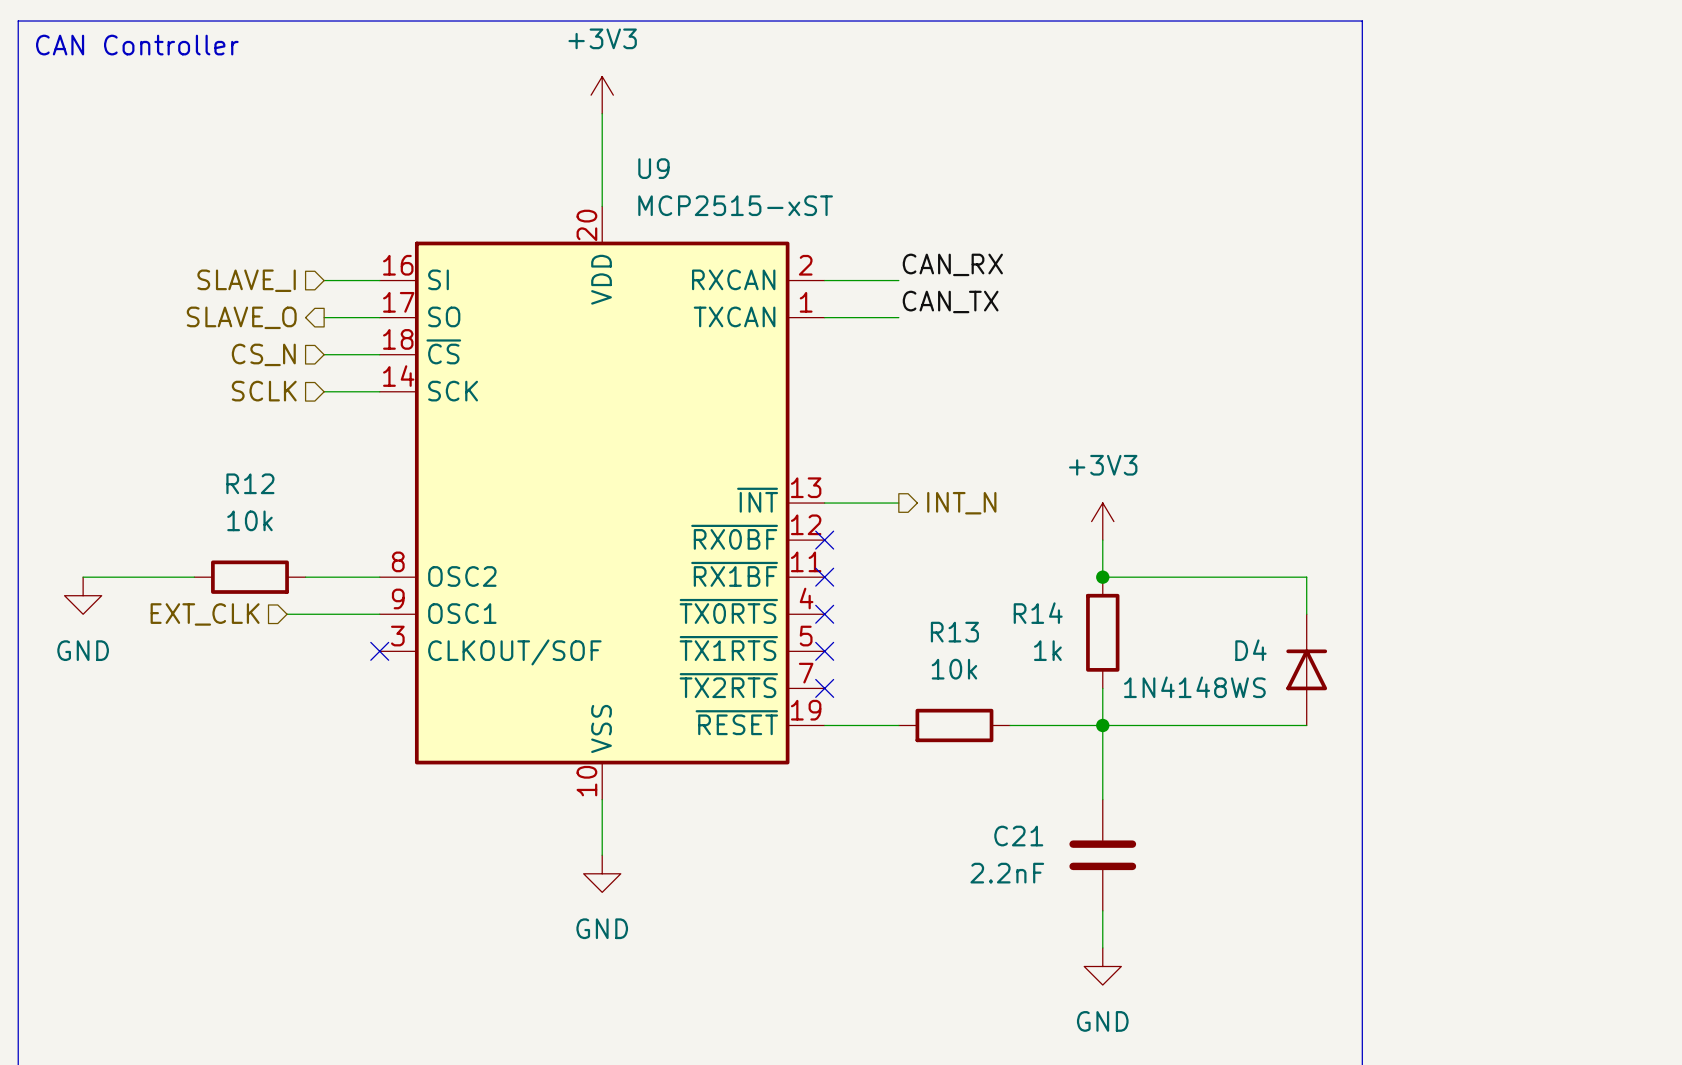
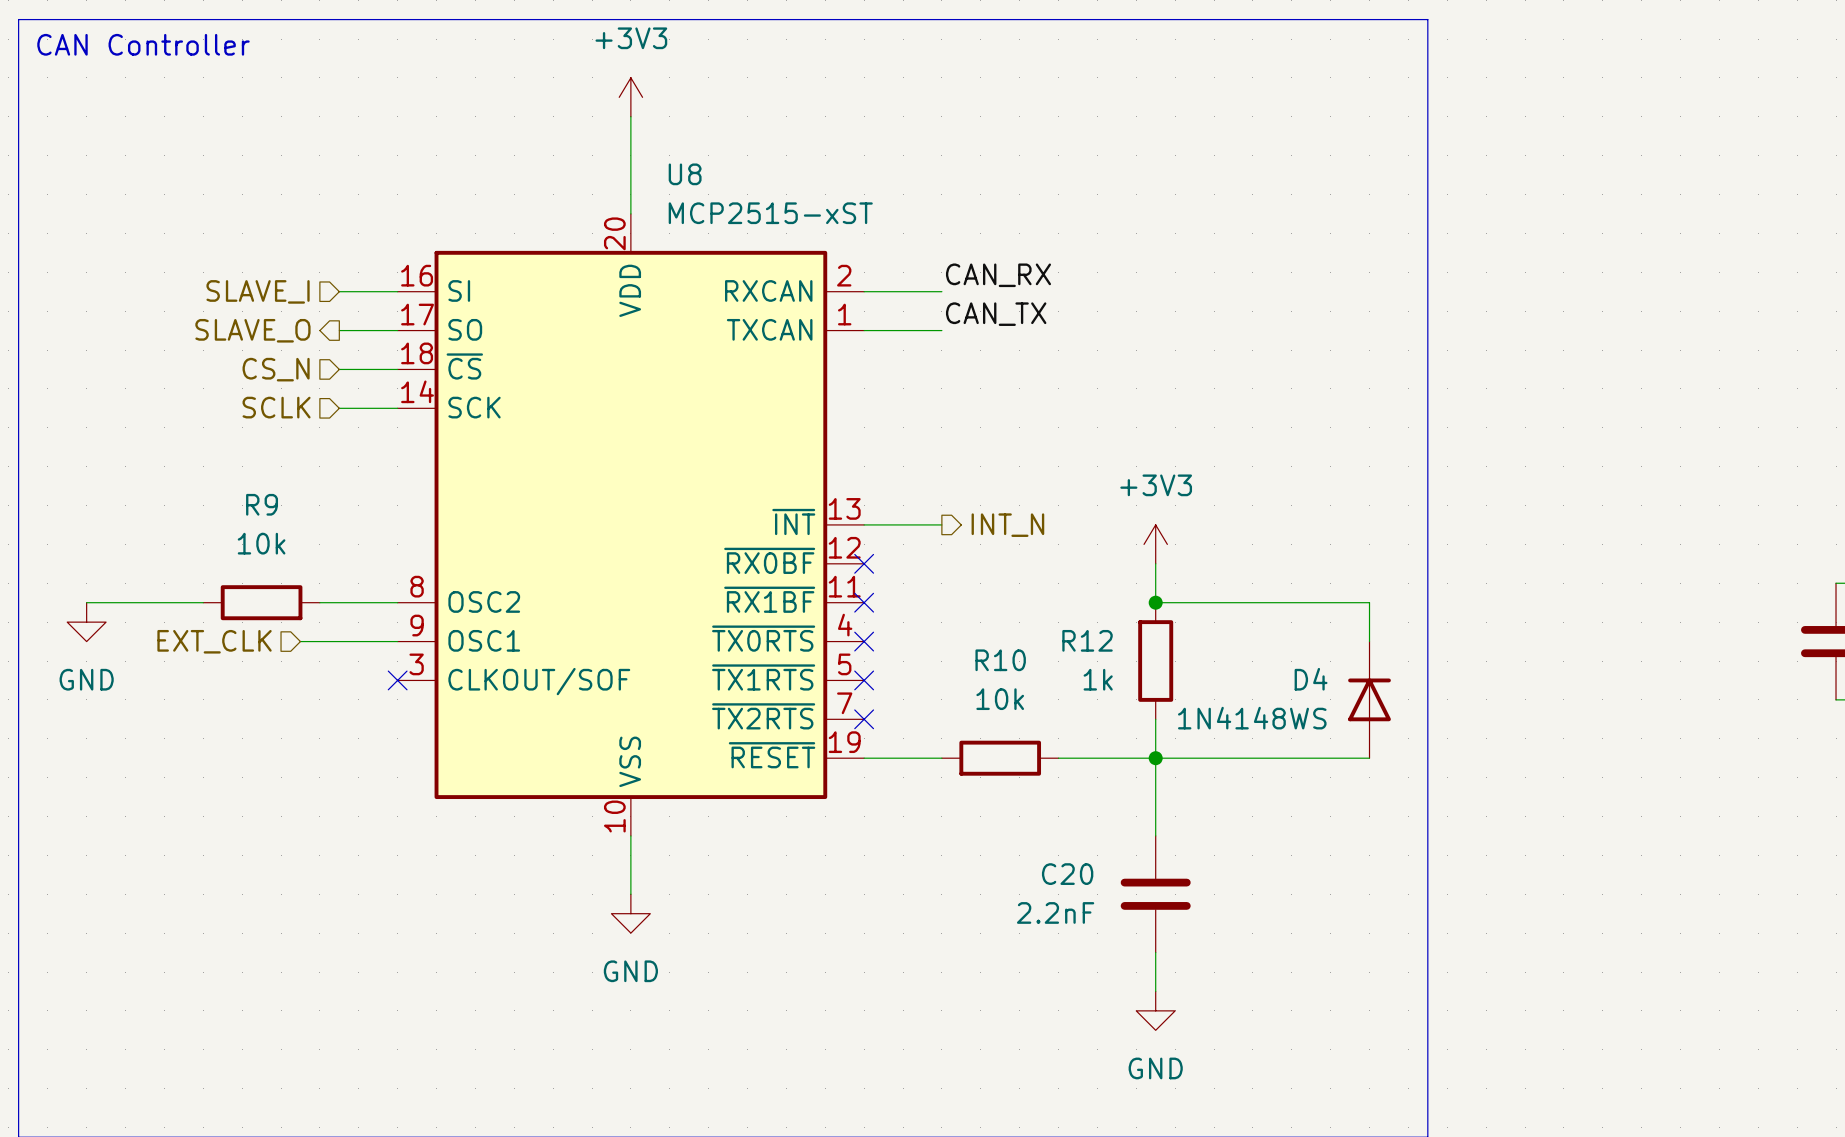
U9 name: U9 (653, 168) -> U8 (685, 174)
R12 name: R12 (250, 483) -> R9 (262, 504)
R14 name: R14 (1038, 613) -> R12 (1087, 640)
R13 name: R13 (954, 632) -> R10 (1000, 660)
C21 name: C21 (1018, 836) -> C20 (1067, 874)

